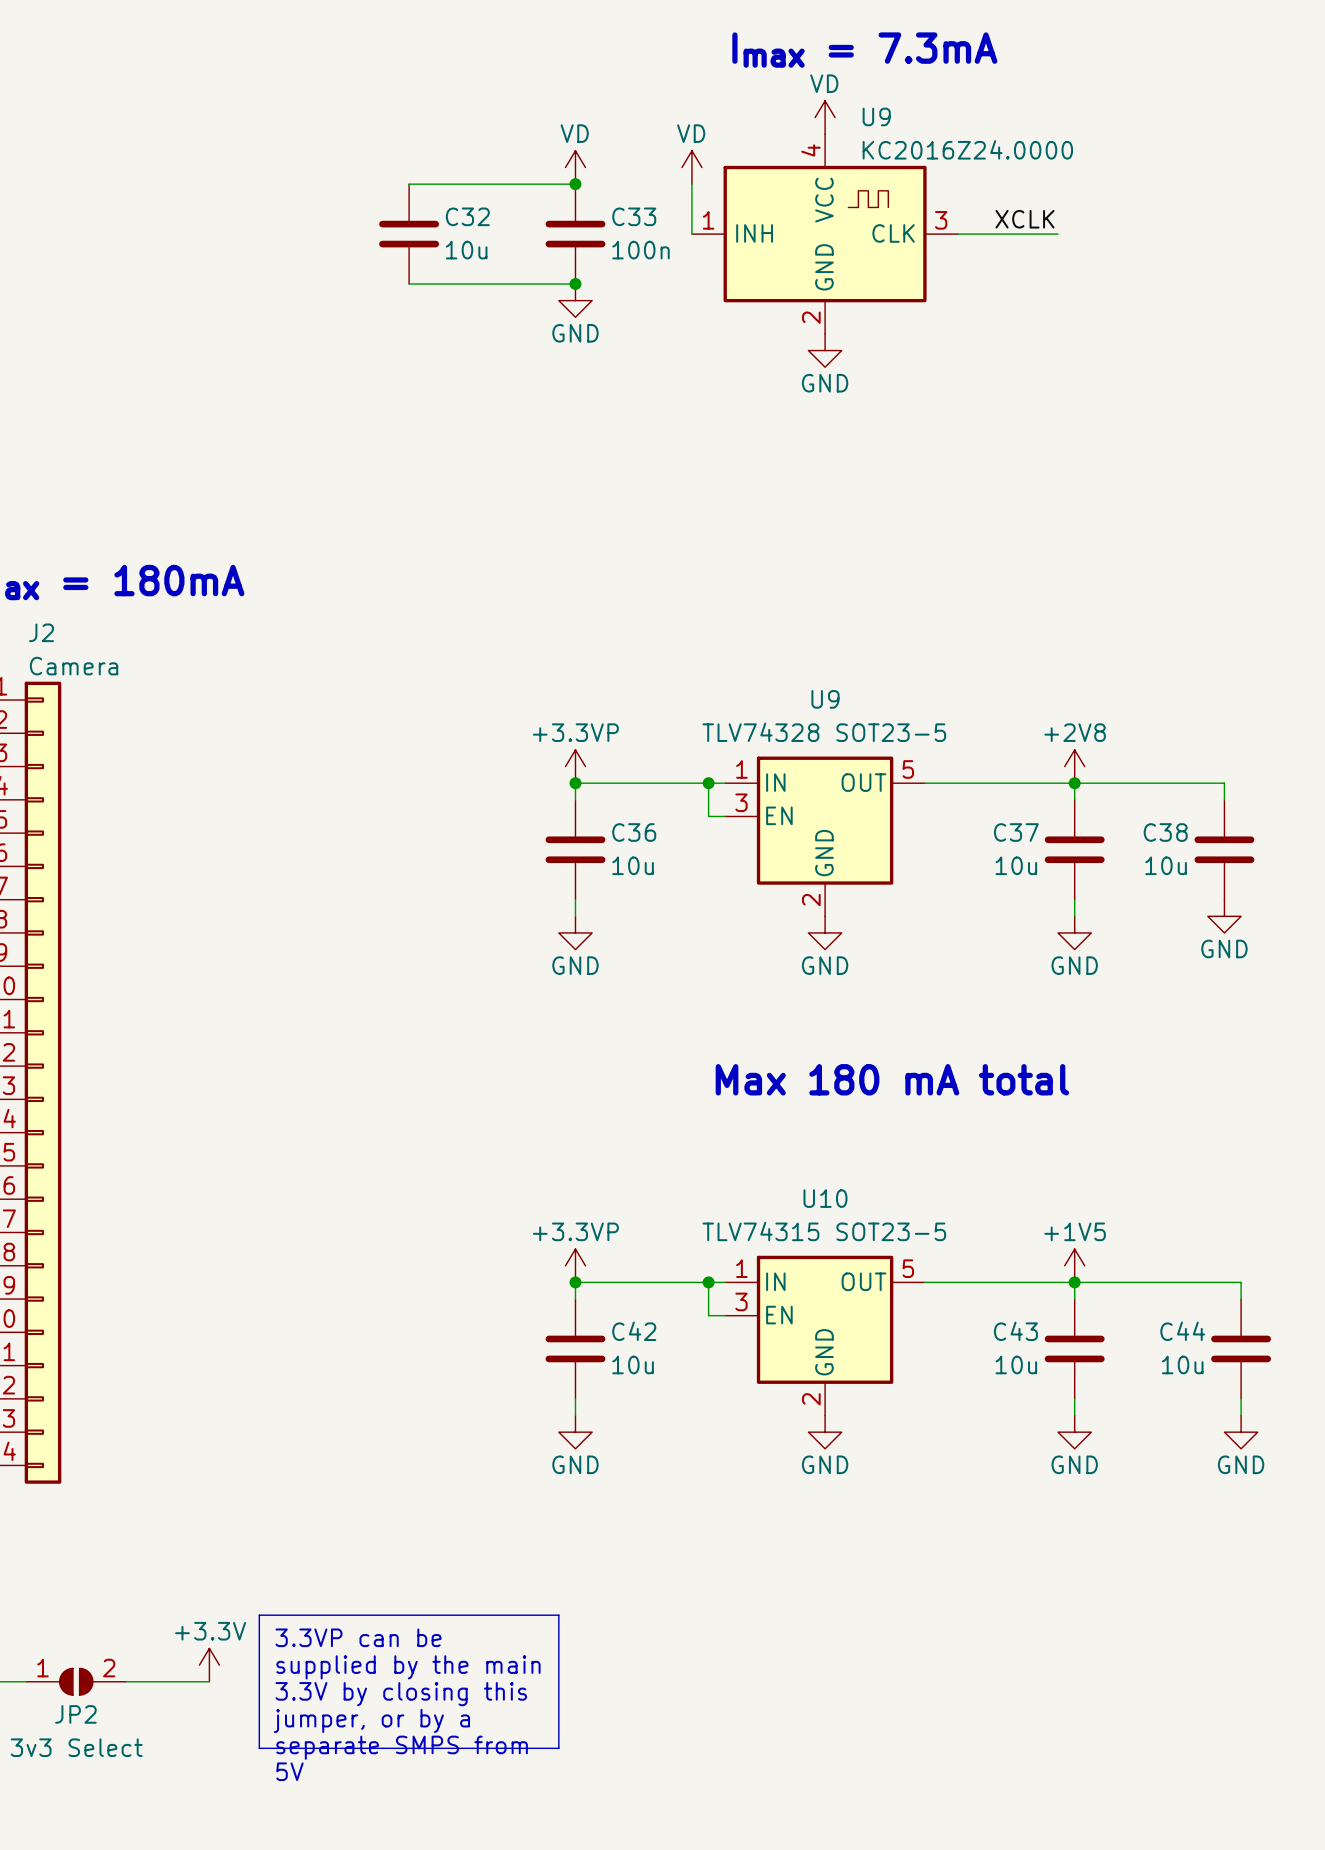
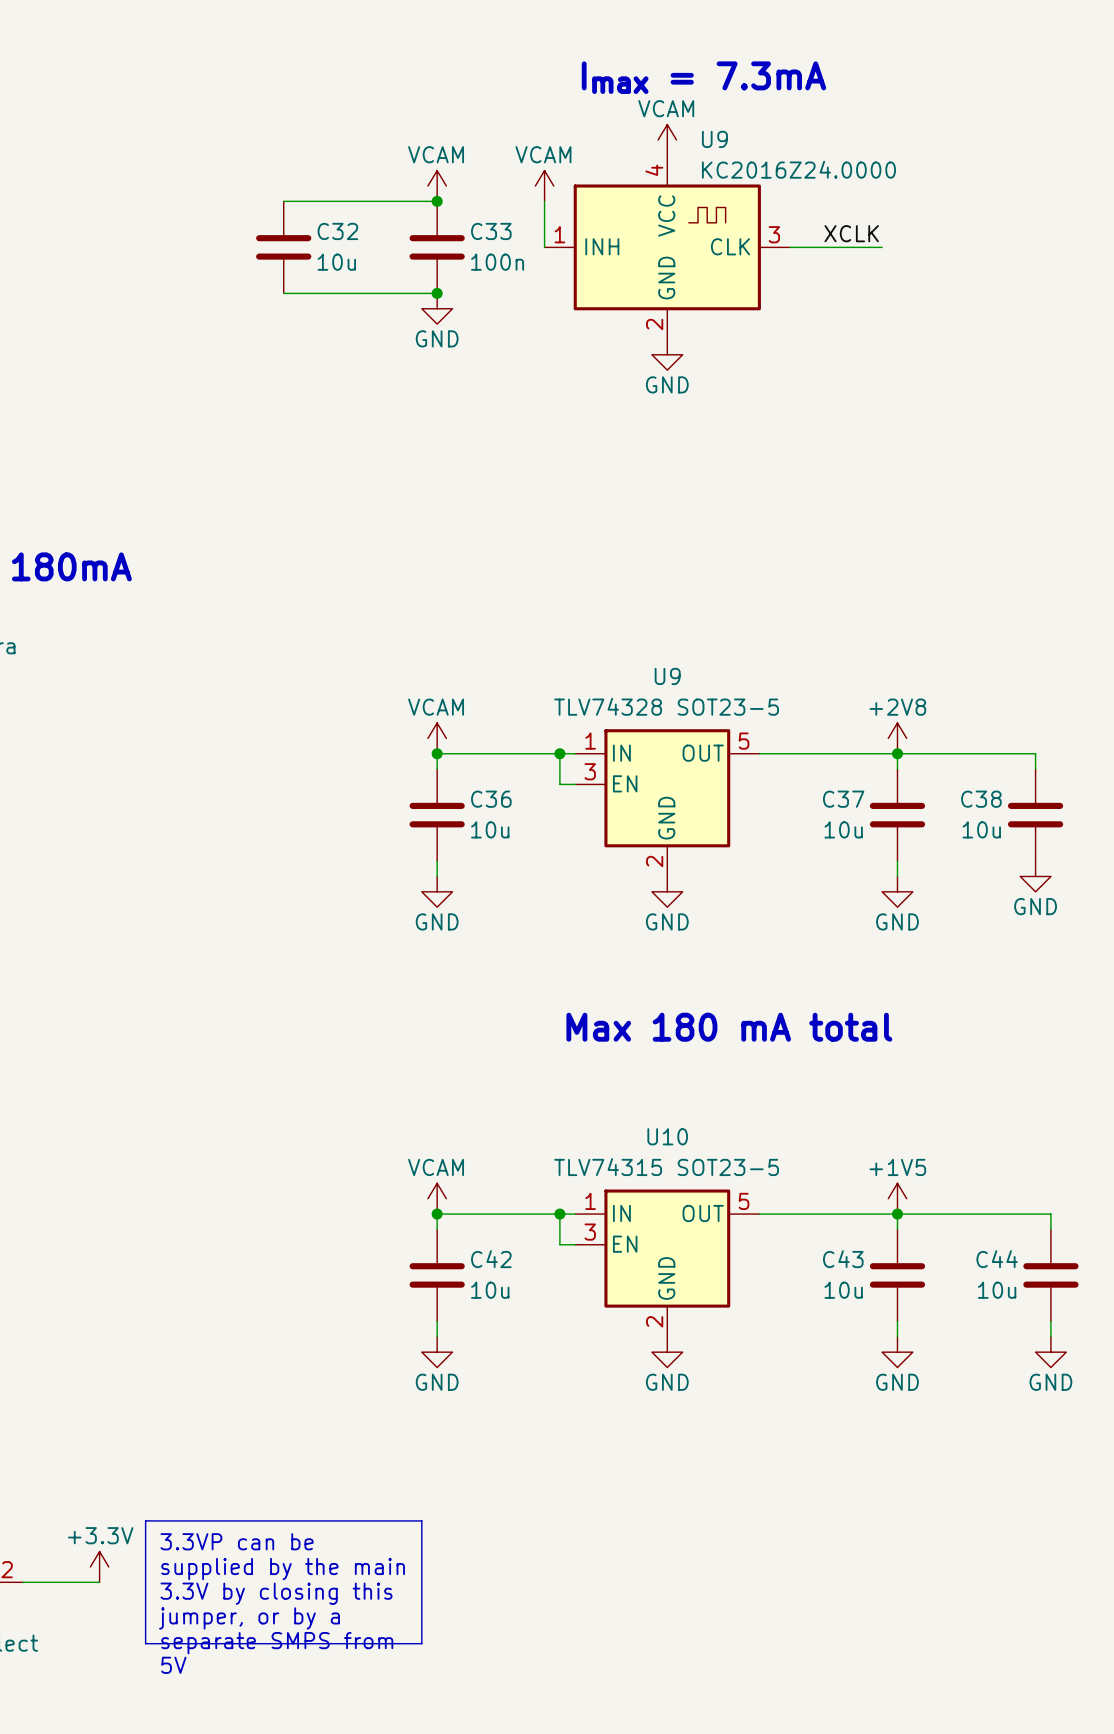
power symbol: VD (825, 117) -> VCAM (667, 139)
power symbol: VD (575, 167) -> VCAM (437, 186)
power symbol: VD (691, 167) -> VCAM (544, 186)
power symbol: +3.3VP (575, 766) -> VCAM (437, 738)
power symbol: +3.3VP (575, 1265) -> VCAM (437, 1198)

